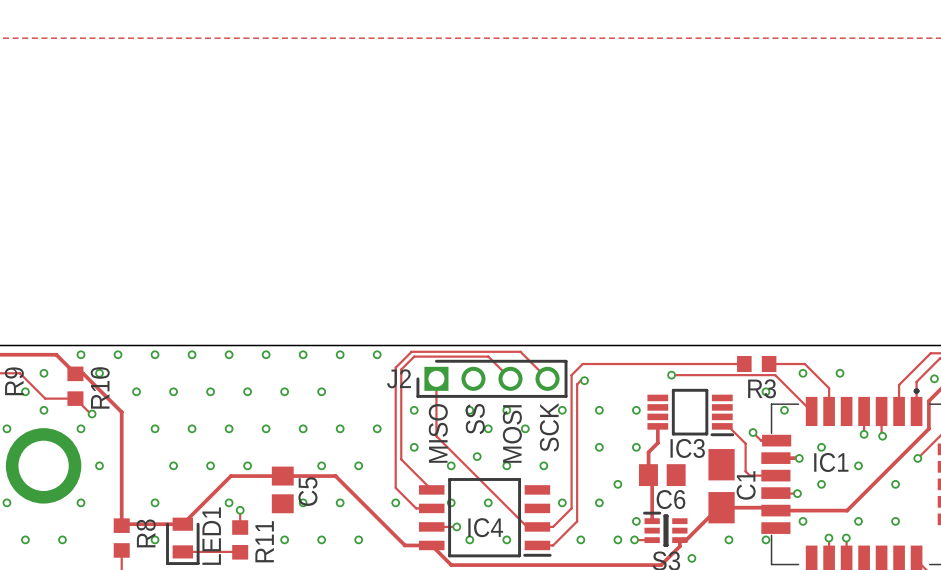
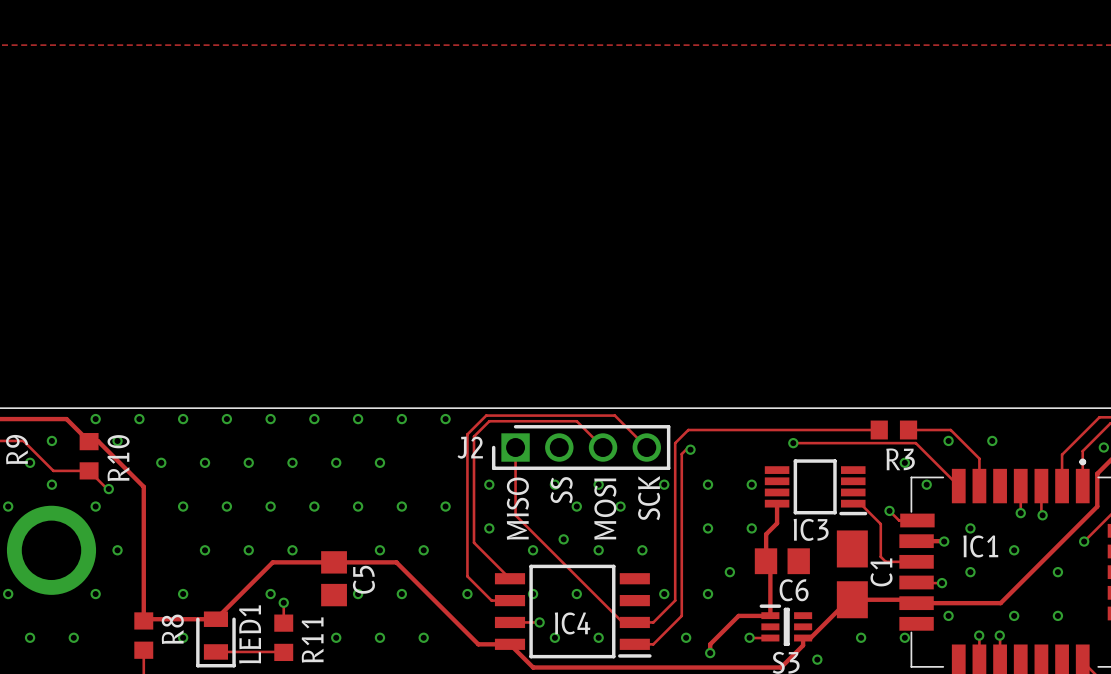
via: (636, 521) -> none
track: none -> (770, 615) (738, 615) (710, 644) (710, 653)
via: (617, 539) -> none
via: none -> (710, 653)

